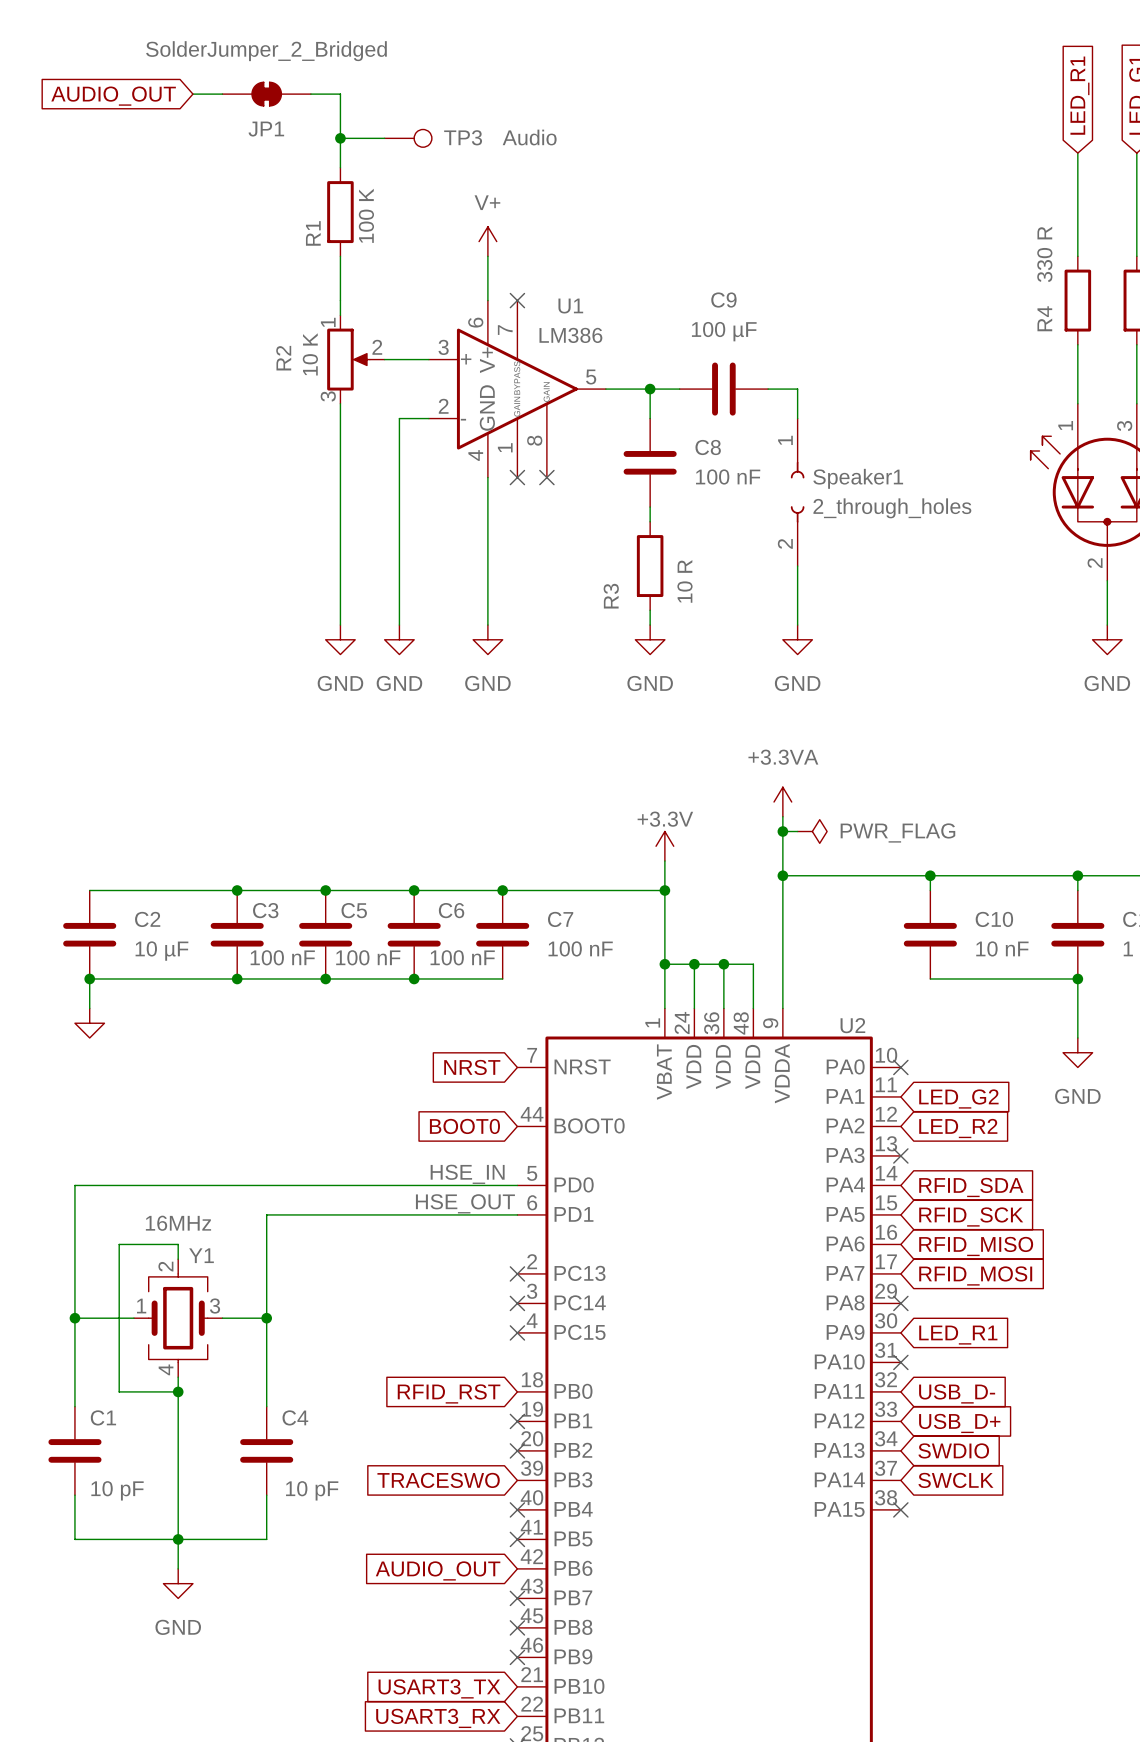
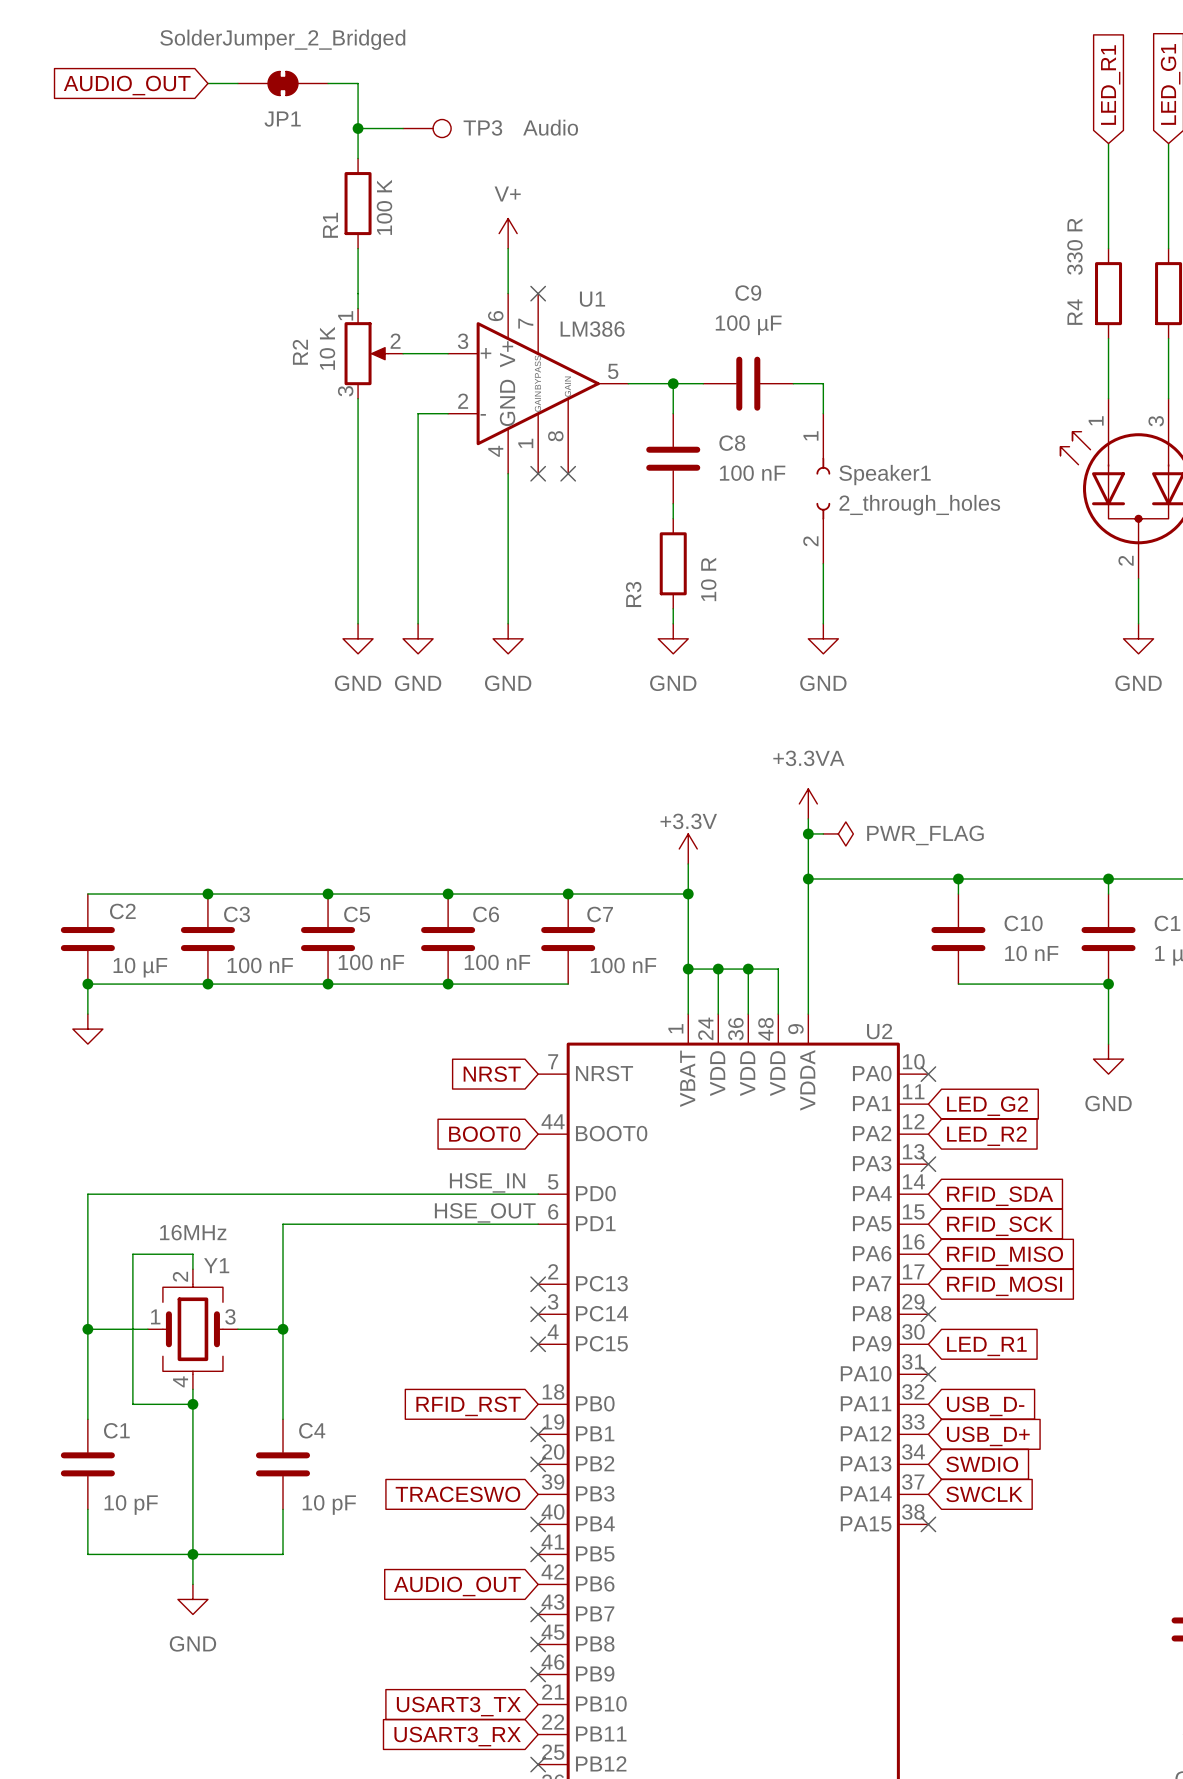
wire: none -> (87, 894) (102, 894)
junction: none -> (207, 894)
junction: (237, 890) -> none
junction position: (325, 890) -> (328, 894)
junction position: (414, 890) -> (448, 894)
junction: (502, 890) -> none
junction: none -> (568, 894)
C2 name position: C2 (147, 919) -> C2 (122, 911)
C7 name position: C7 (560, 919) -> C7 (600, 914)
C2 position: (89, 934) -> (87, 939)
C3 position: (237, 934) -> (207, 939)
C5 position: (325, 934) -> (328, 939)
C6 position: (414, 934) -> (448, 939)
C7 position: (502, 934) -> (568, 939)
C7 value position: 100 nF (580, 948) -> 100 nF (623, 965)
C2 value position: 10 µF (161, 951) -> 10 µF (140, 967)
C3 value position: 100 nF (282, 957) -> 100 nF (260, 965)
wire: (89, 978) (89, 1008) -> (102, 984) (87, 984) (87, 1014)
junction position: (89, 978) -> (87, 984)
junction: none -> (207, 984)
junction: (237, 978) -> none
junction position: (325, 978) -> (328, 984)
junction position: (414, 978) -> (448, 984)
wire: none -> (523, 984) (568, 984)
power symbol position: (89, 1023) -> (87, 1029)

